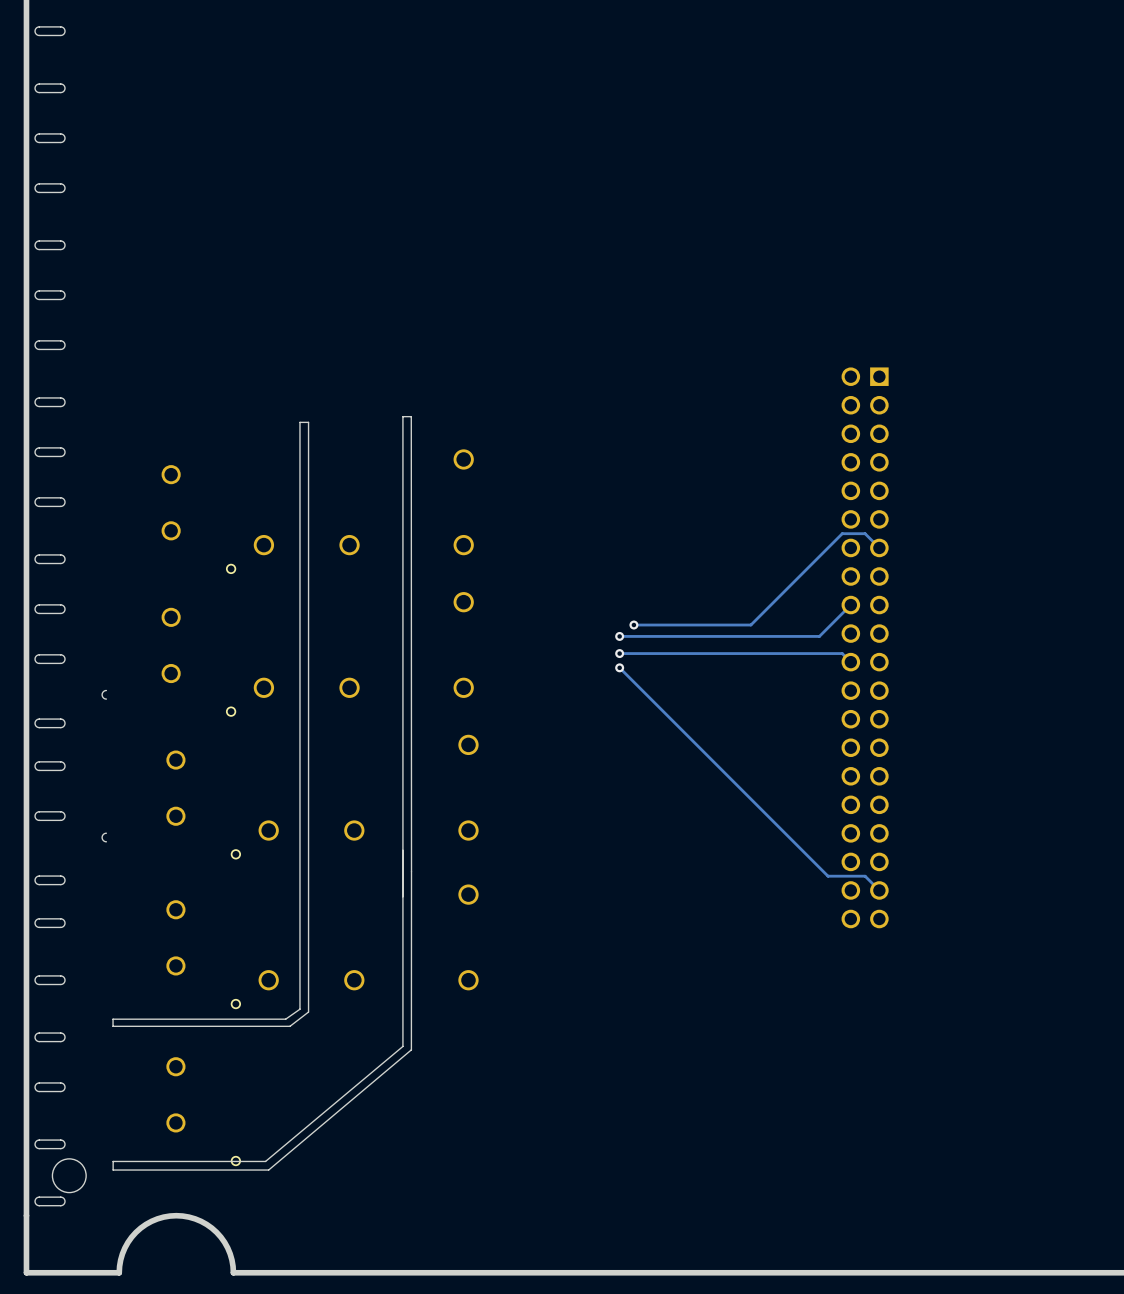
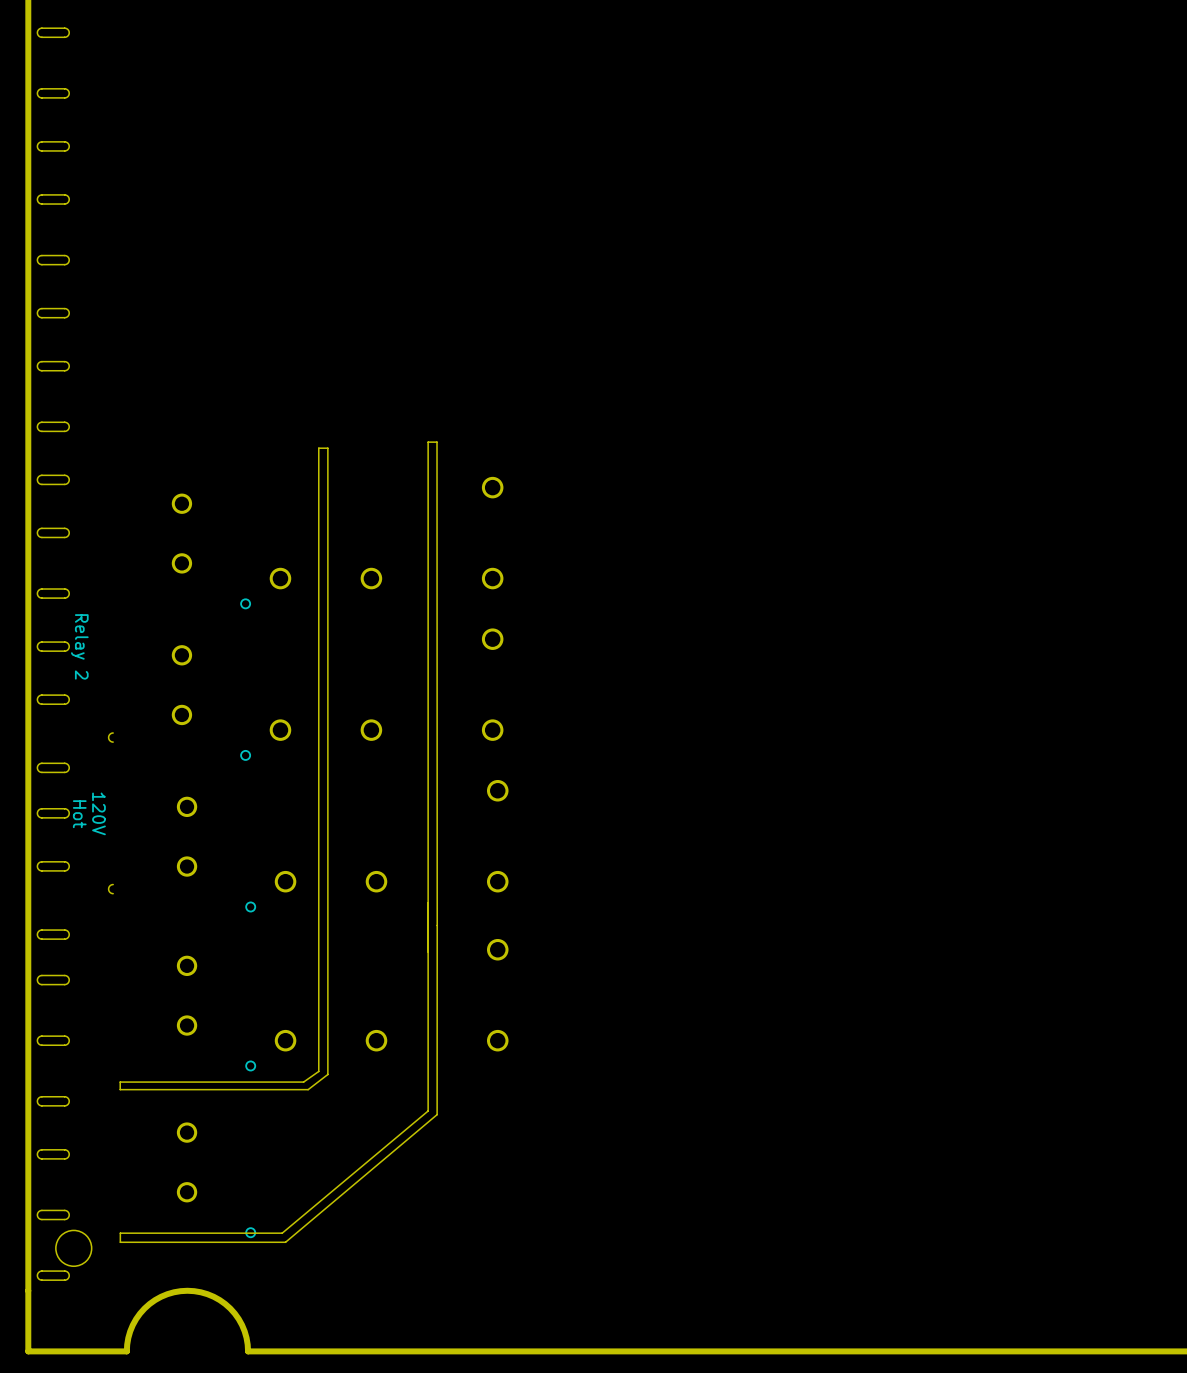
track: (879, 547) (865, 533) (842, 533) (750, 625) (633, 625) -> none
track: (850, 605) (819, 636) (619, 636) -> none
text: none -> Relay 2 (79, 646)
via: (633, 625) -> none
via: (619, 636) -> none
part: (865, 647) -> none
track: (619, 653) (842, 653) (850, 662) -> none
via: (619, 653) -> none
track: (619, 667) (828, 876) (865, 876) (879, 890) -> none
via: (619, 667) -> none
text: none -> Hot (79, 814)
text: none -> 120V (98, 813)

